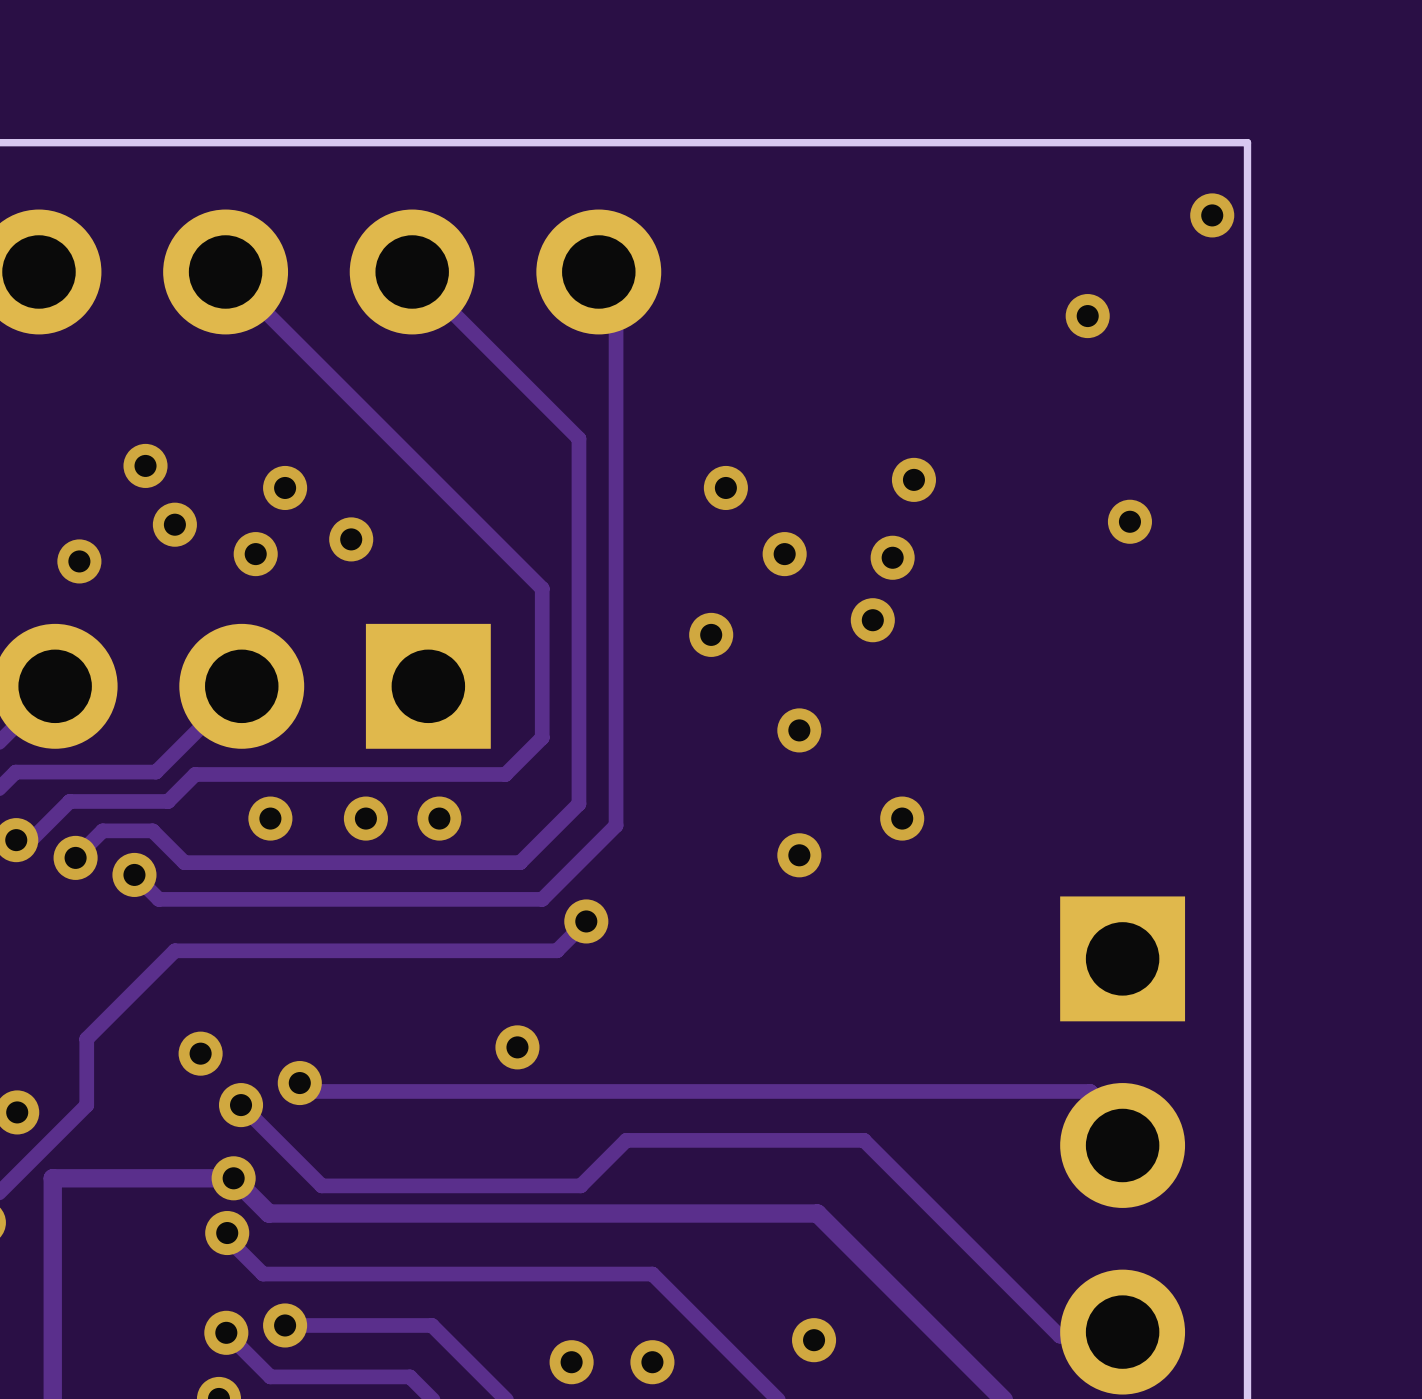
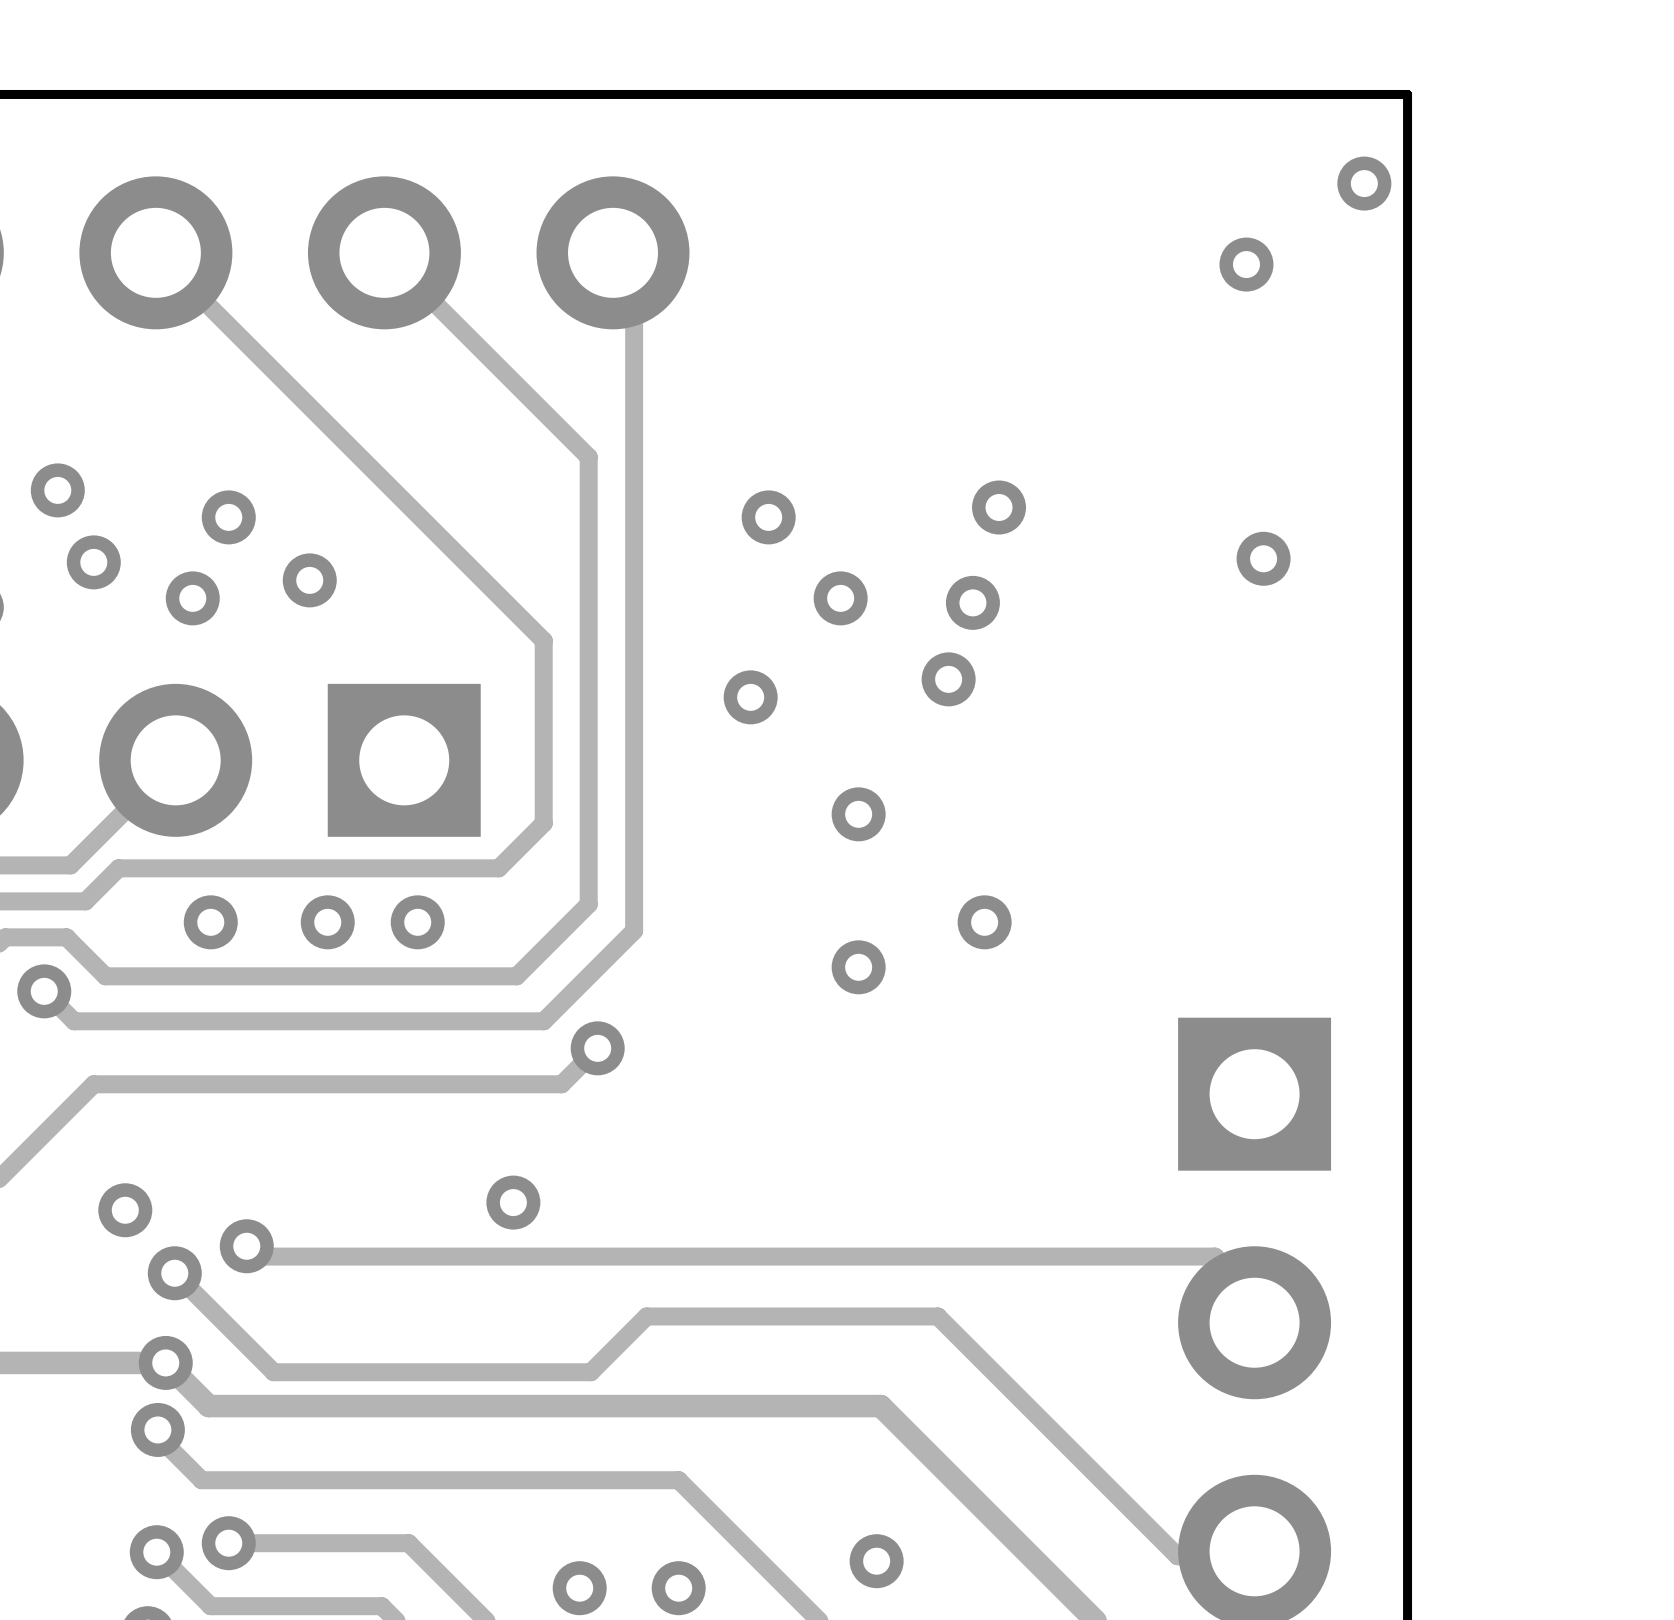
via position: (1087, 316) -> (1246, 264)

